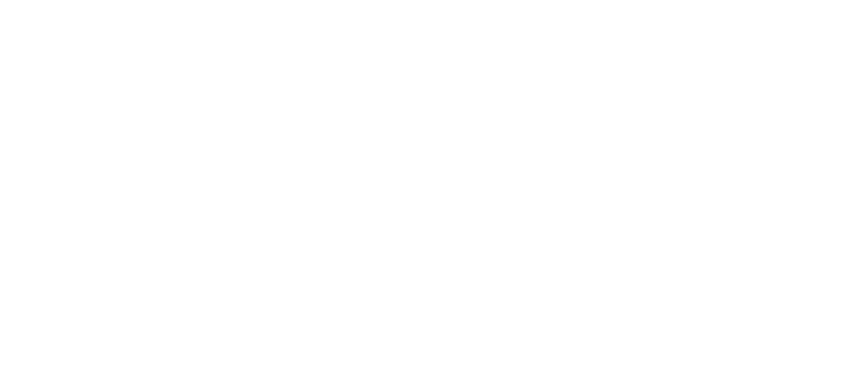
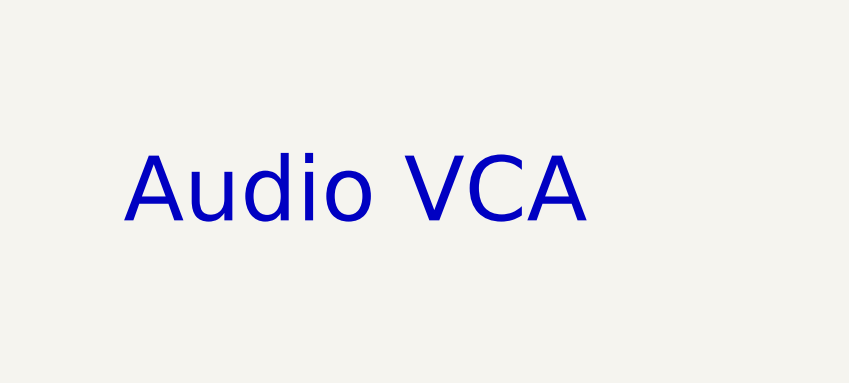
text: none -> Audio VCA (355, 187)

